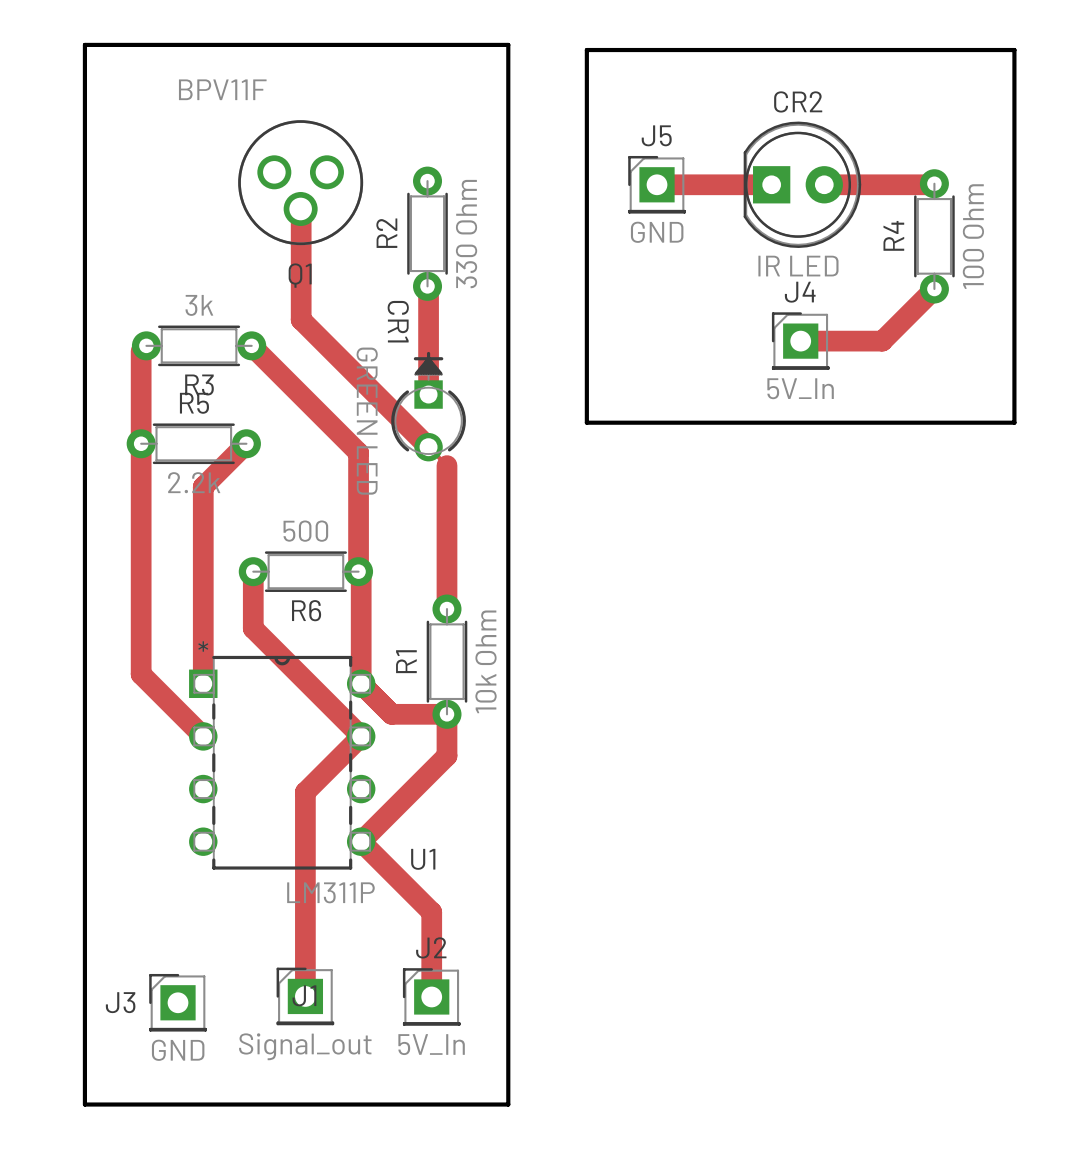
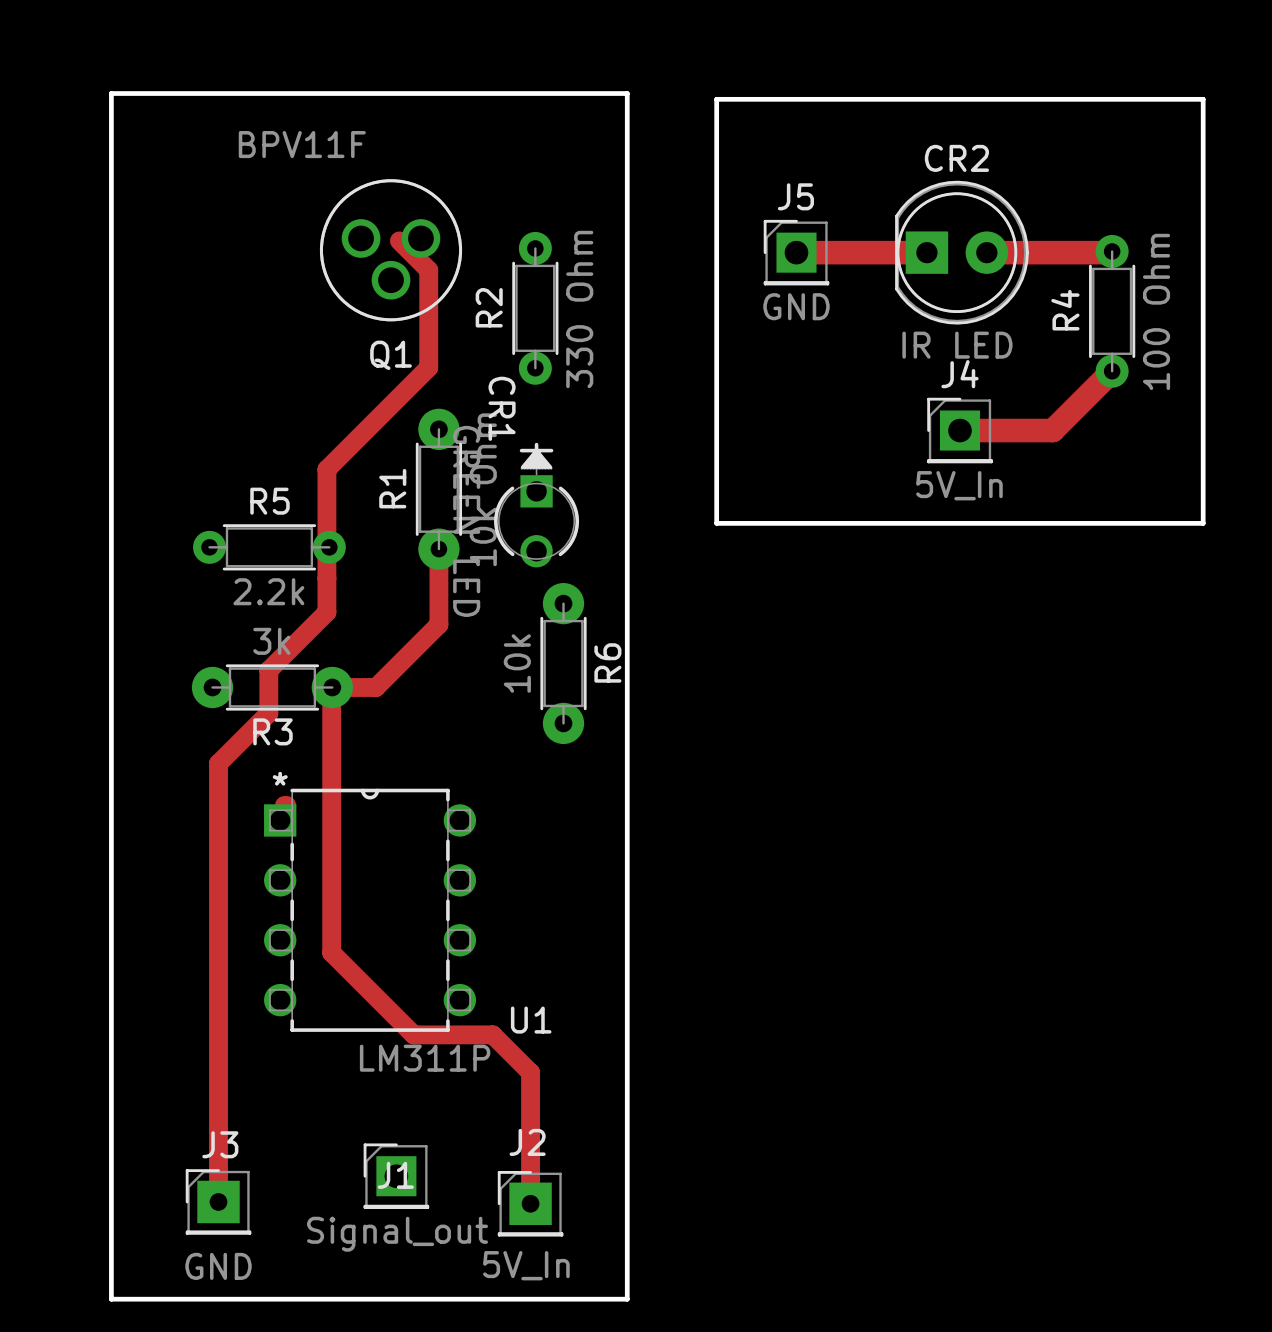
board edge: (84, 44) (84, 1104) -> (145, 93) (111, 93) (111, 1299) (145, 1299)
track: none -> (399, 240) (428, 270) (428, 367) (326, 469) (326, 612) (268, 670) (268, 713) (218, 763) (218, 1201)
track: (301, 206) (301, 319) (446, 465) (446, 609) -> none
track: (427, 286) (428, 394) -> none
R3 footprint: [131, 325, 267, 367] -> [191, 664, 353, 711]
track: (146, 345) (141, 351) (141, 674) (203, 736) -> none
track: (251, 345) (358, 452) (361, 683) (391, 714) (446, 714) (446, 755) (361, 841) -> none
track: (246, 443) (203, 486) (203, 683) -> none
track: none -> (438, 549) (438, 624) (376, 687) (331, 688) (331, 952) (413, 1034) (492, 1034) (530, 1072) (530, 1203)
R6 value: 500 (305, 531) -> 10k (517, 663)
R6 footprint: [238, 551, 374, 592] -> [540, 583, 587, 745]
track: (253, 571) (253, 628) (361, 736) (305, 792) (305, 996) -> none
R1 footprint: [426, 594, 468, 729] -> [415, 408, 463, 570]
R6 name position: R6 (306, 610) -> R6 (607, 662)
track: none -> (284, 805) (286, 805)
track: (361, 841) (431, 912) (431, 996) -> none
J2 footprint: [402, 968, 461, 1026] -> [497, 1171, 564, 1237]
J3 footprint: [149, 973, 207, 1032] -> [185, 1169, 252, 1235]
J3 name position: J3 (120, 1002) -> J3 (220, 1144)

